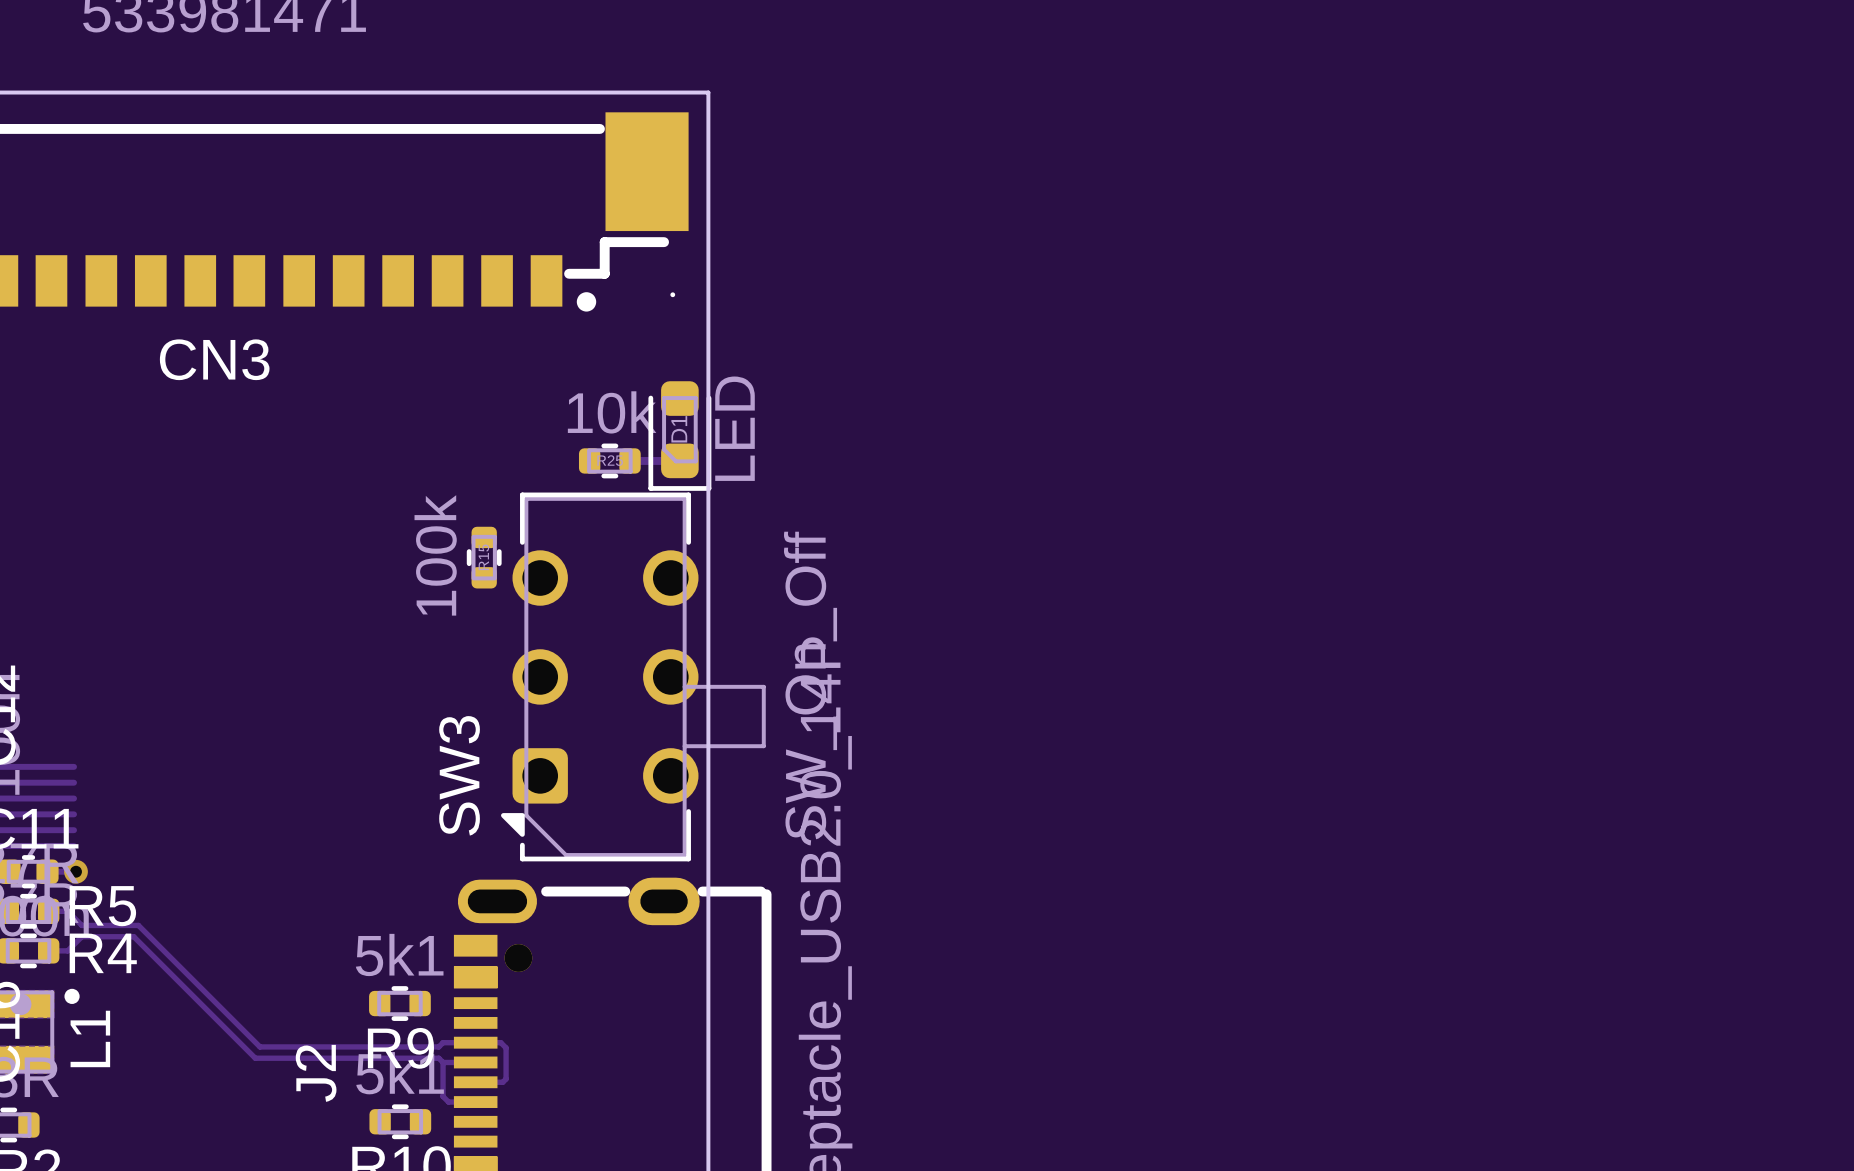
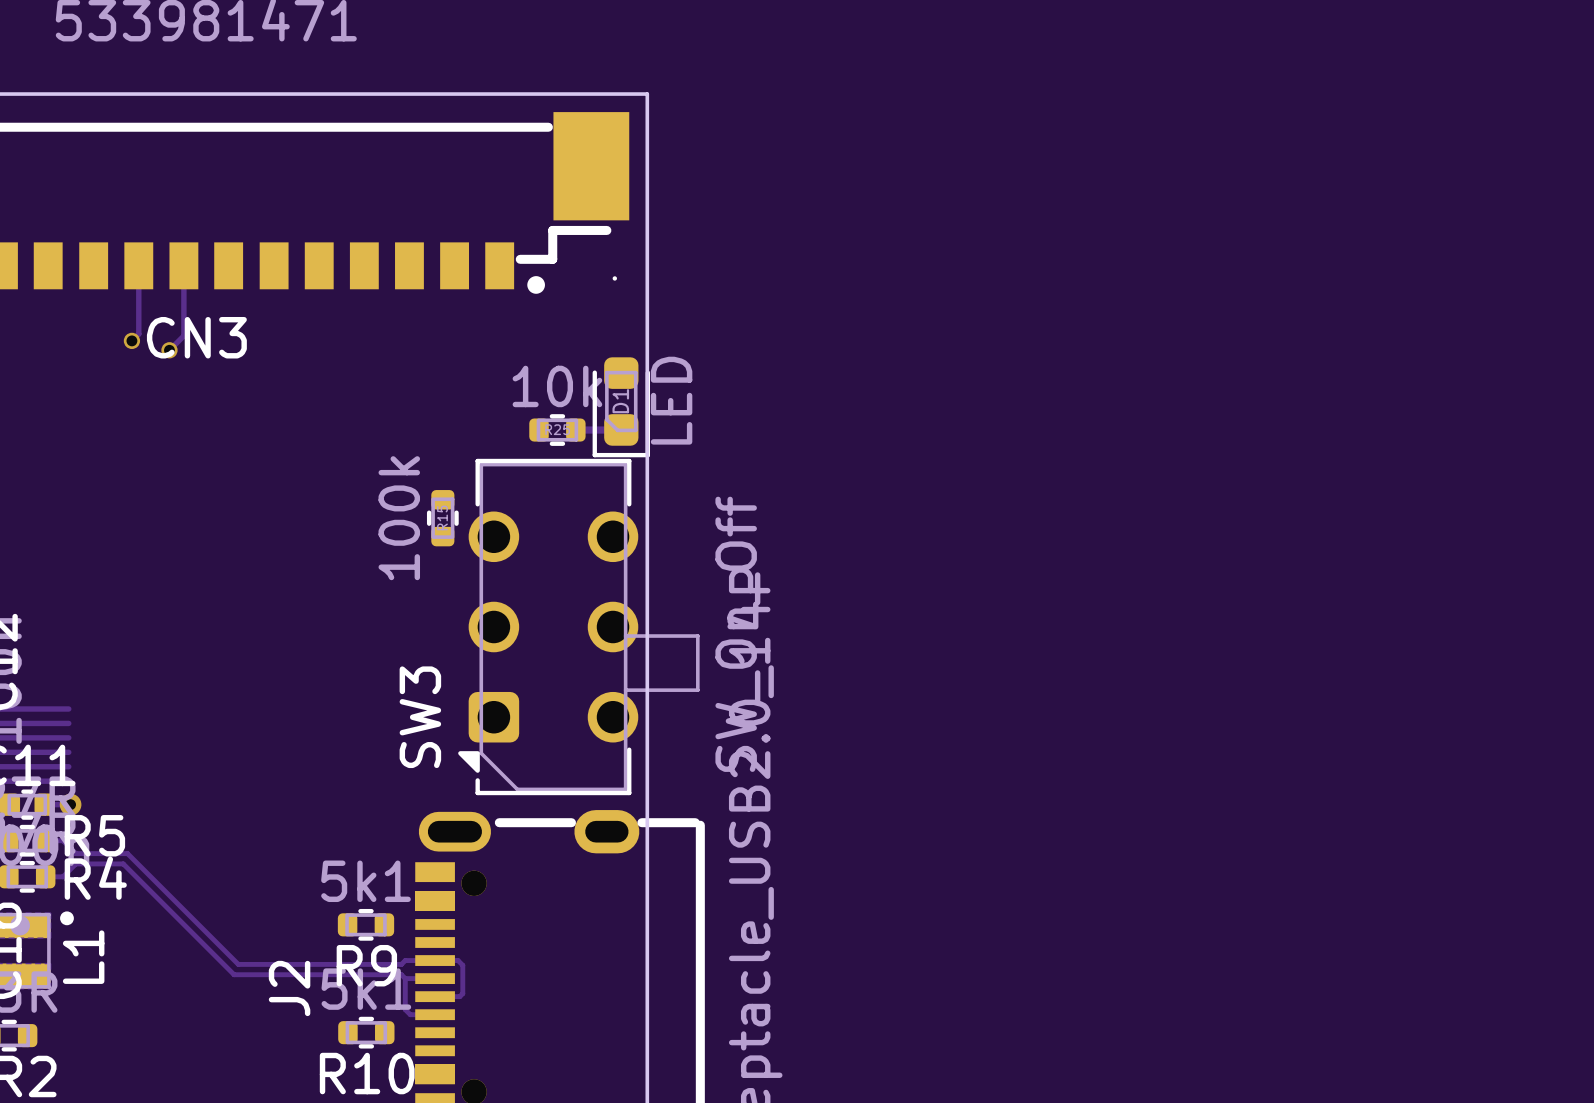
track: none -> (138, 265) (138, 334) (131, 340)
track: none -> (183, 265) (183, 335) (169, 350)
via: none -> (131, 340)
via: none -> (169, 350)

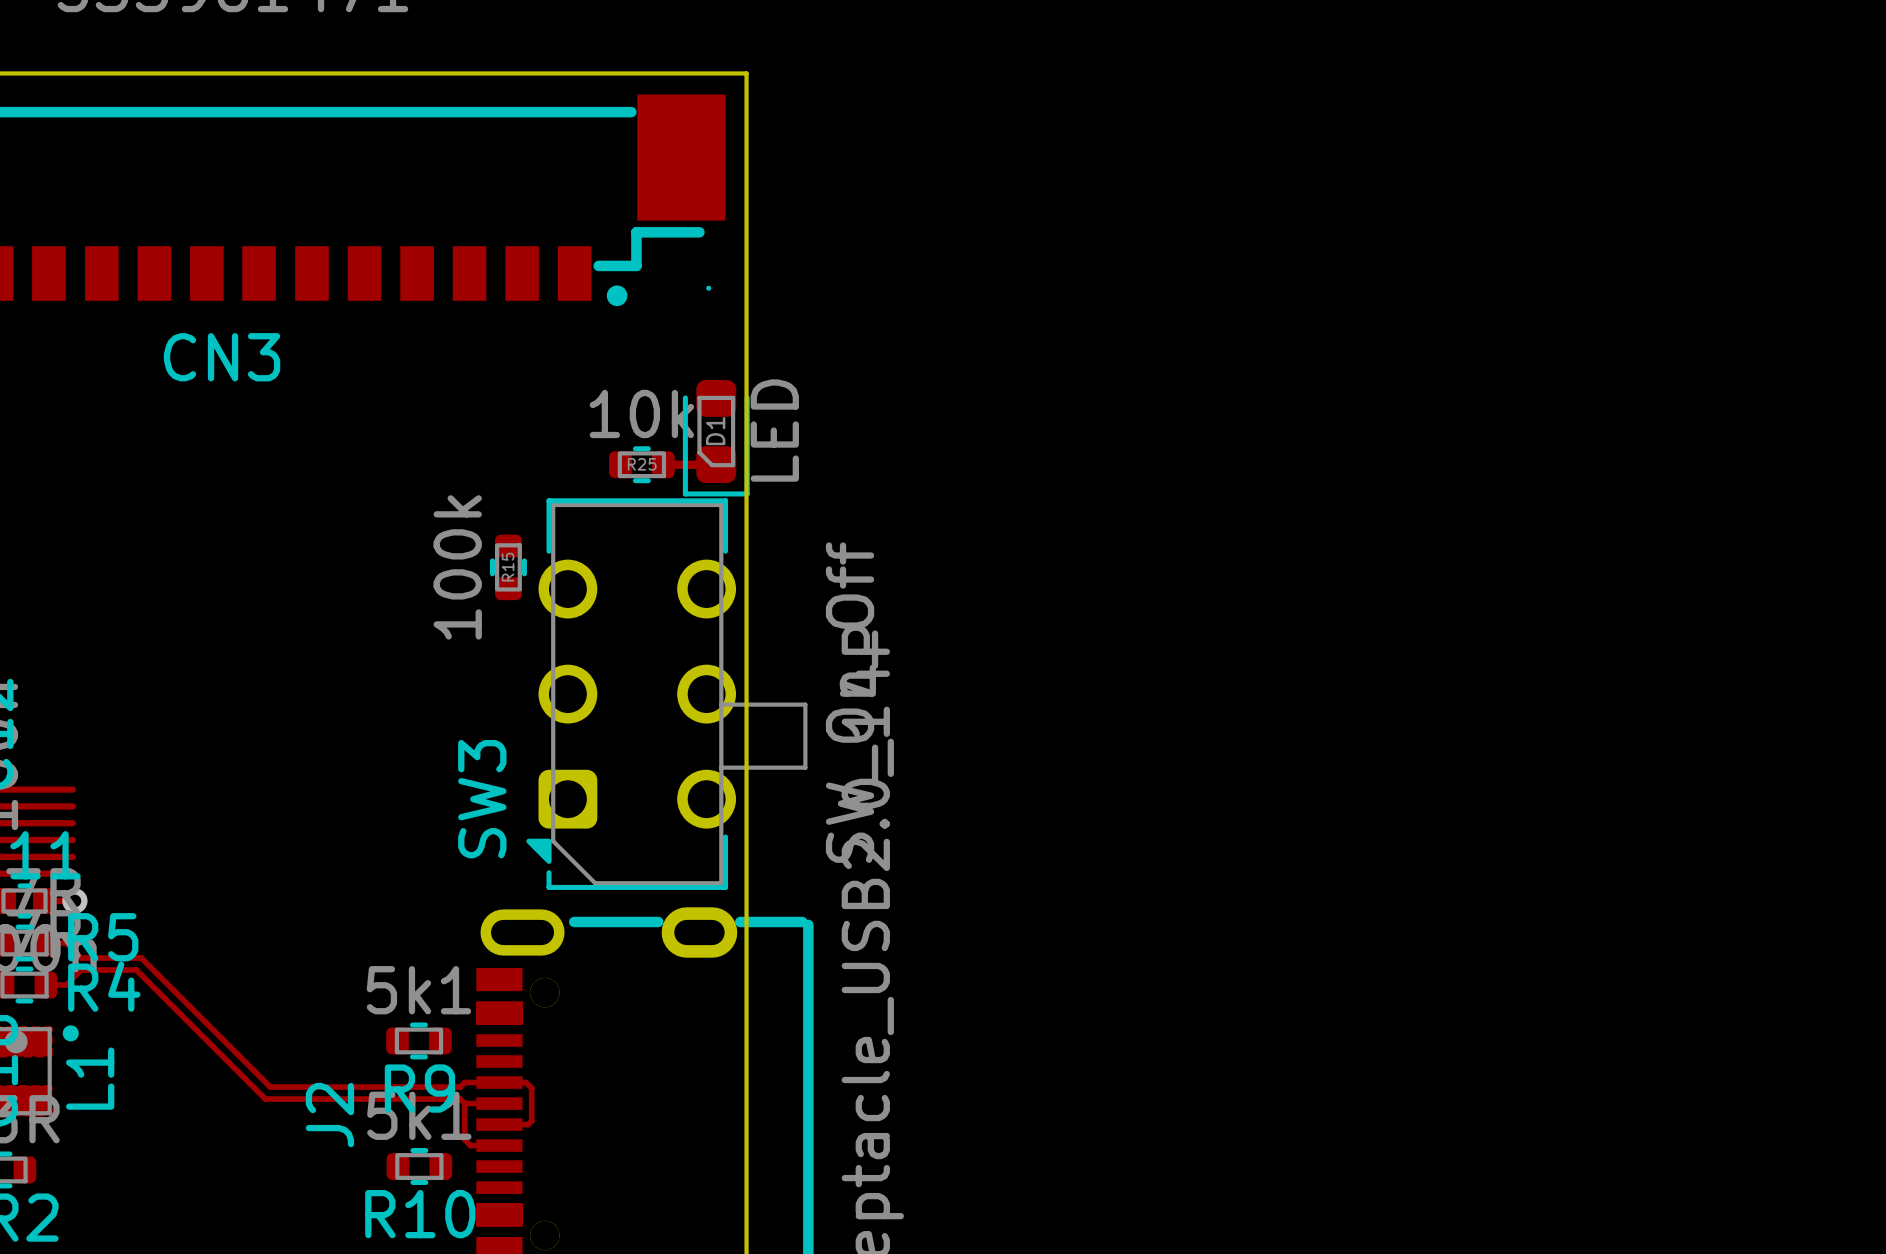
track: (138, 265) (138, 334) (131, 340) -> none
track: (183, 265) (183, 335) (169, 350) -> none
via: (131, 340) -> none
via: (169, 350) -> none

